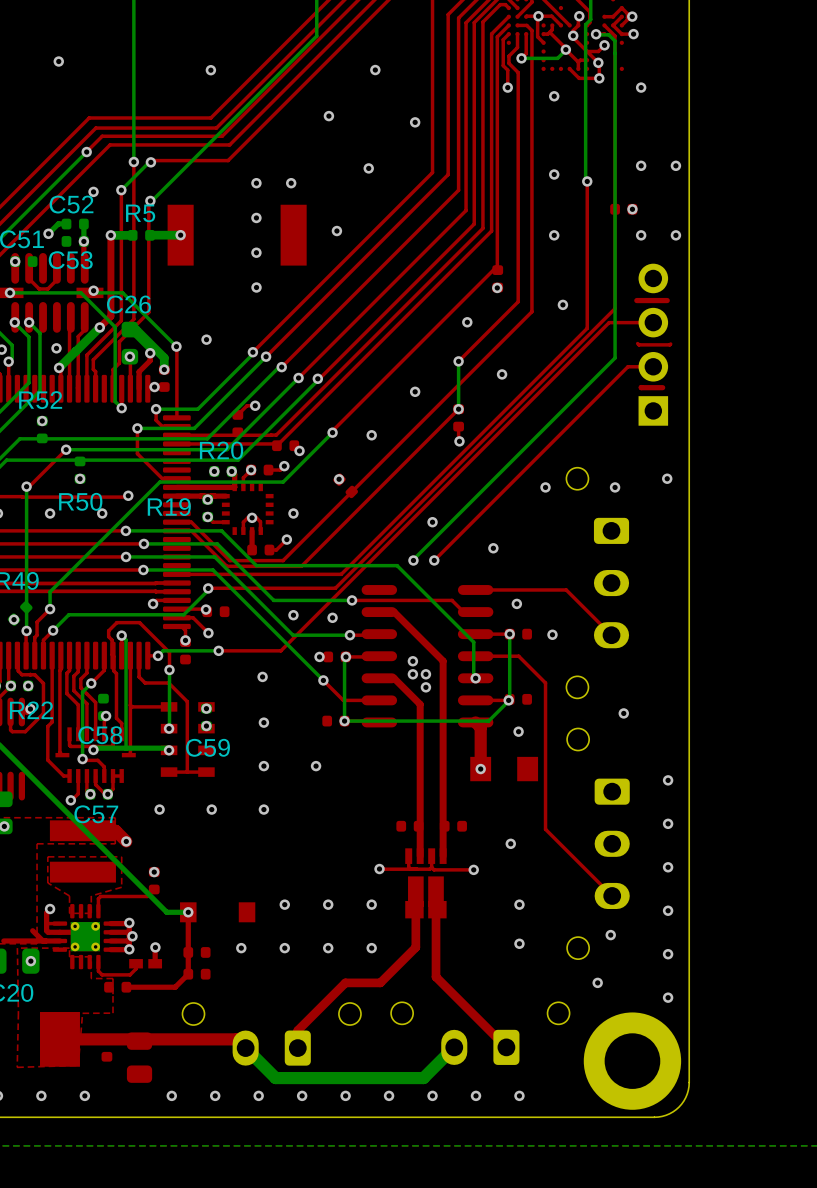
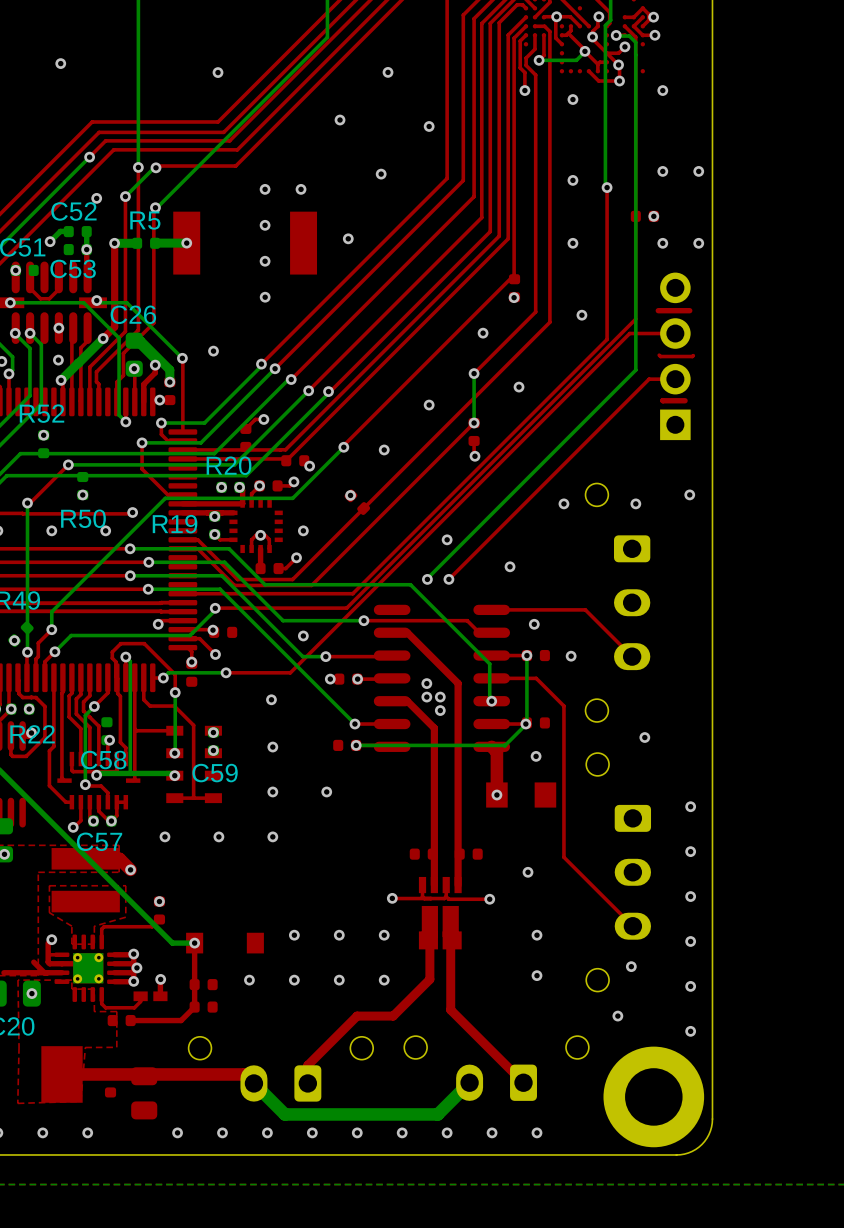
via: none -> (58, 328)
via: (332, 617) -> none
via: none -> (325, 656)
top track: none -> (361, 656) (325, 656)
bottom track: (349, 635) (315, 635) -> none
via: (349, 635) -> none
bottom track: (345, 656) (344, 721) -> none
top track: (323, 680) (343, 700) -> none
bottom track: none -> (334, 703) (354, 724)
via: (323, 680) -> none
via: none -> (354, 724)

